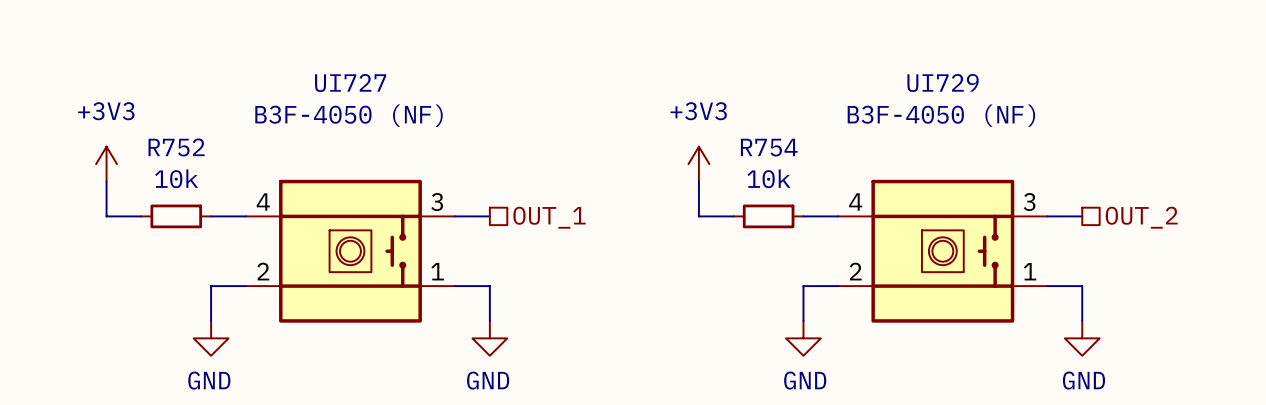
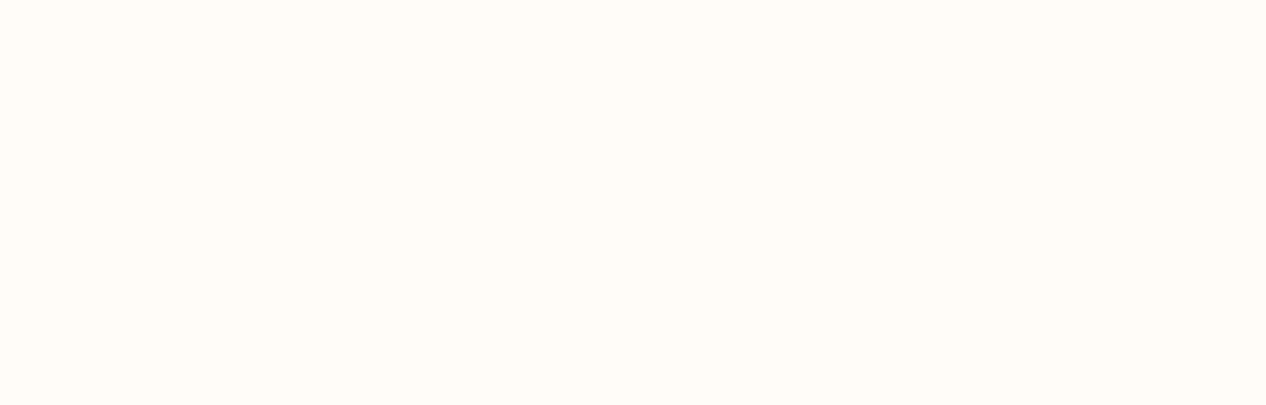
power symbol: +3V3 (106, 164) -> none
power symbol: +3V3 (698, 164) -> none
wire: (106, 181) (106, 216) (141, 216) -> none
wire: (698, 181) (698, 216) (733, 216) -> none
R752: 10k (176, 216) -> none
wire: (211, 216) (245, 216) -> none
wire: (455, 216) (489, 216) -> none
R754: 10k (768, 216) -> none
wire: (803, 216) (838, 216) -> none
wire: (1047, 216) (1082, 216) -> none
hierarchical label: OUT_1 (549, 217) -> none
hierarchical label: OUT_2 (1141, 217) -> none
UI727: B3F-4050 (NF) (350, 251) -> none
UI729: B3F-4050 (NF) (942, 251) -> none
wire: (245, 286) (211, 286) (211, 320) -> none
wire: (455, 286) (489, 286) (489, 320) -> none
wire: (838, 286) (803, 286) (803, 320) -> none
wire: (1047, 286) (1082, 286) (1082, 320) -> none
power symbol: GND (211, 338) -> none
power symbol: GND (489, 338) -> none
power symbol: GND (803, 338) -> none
power symbol: GND (1082, 338) -> none

